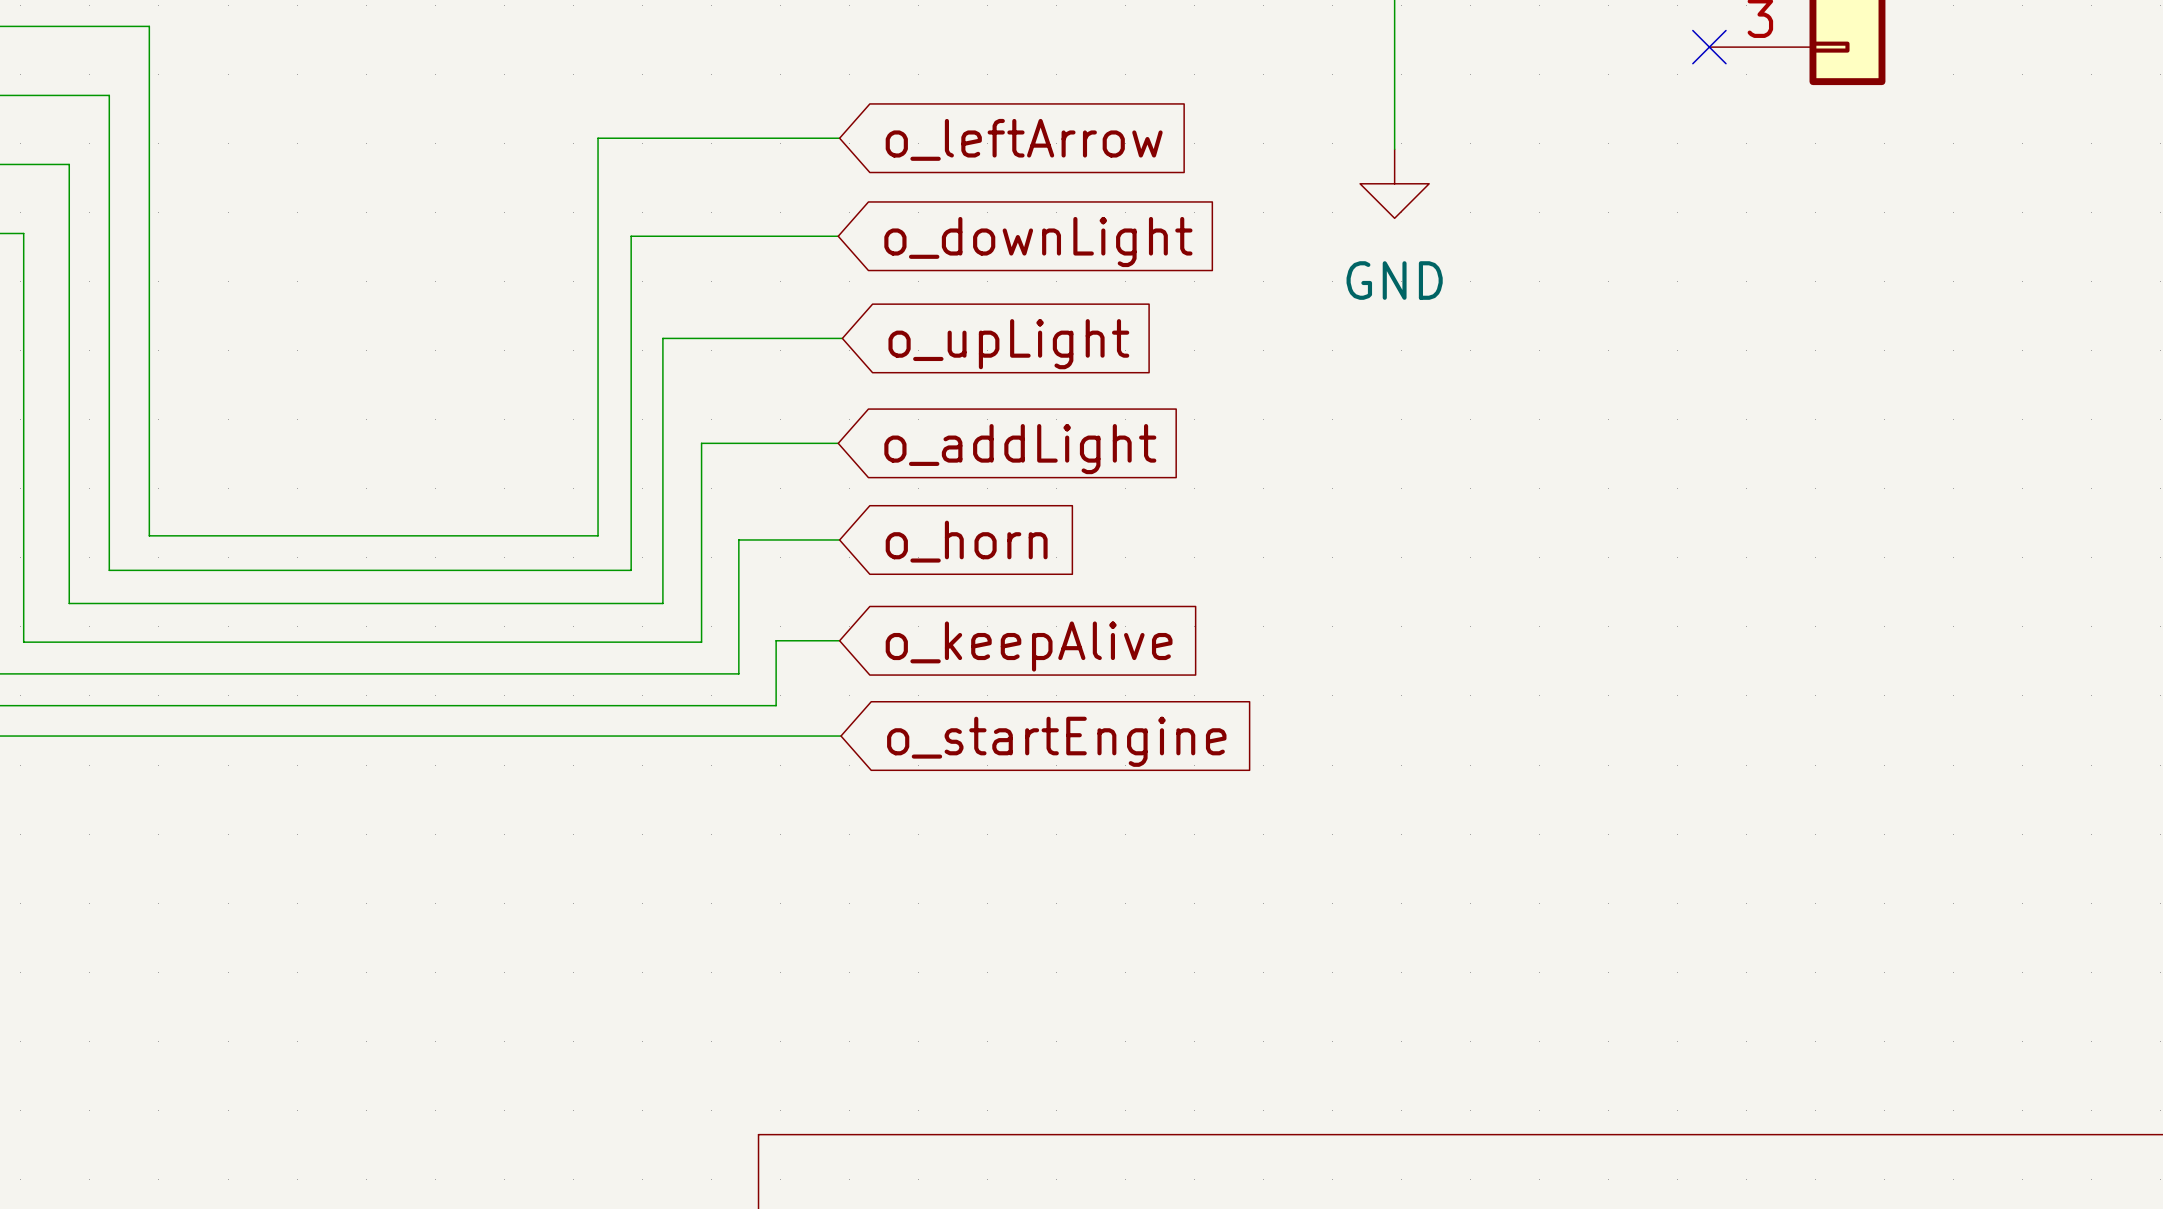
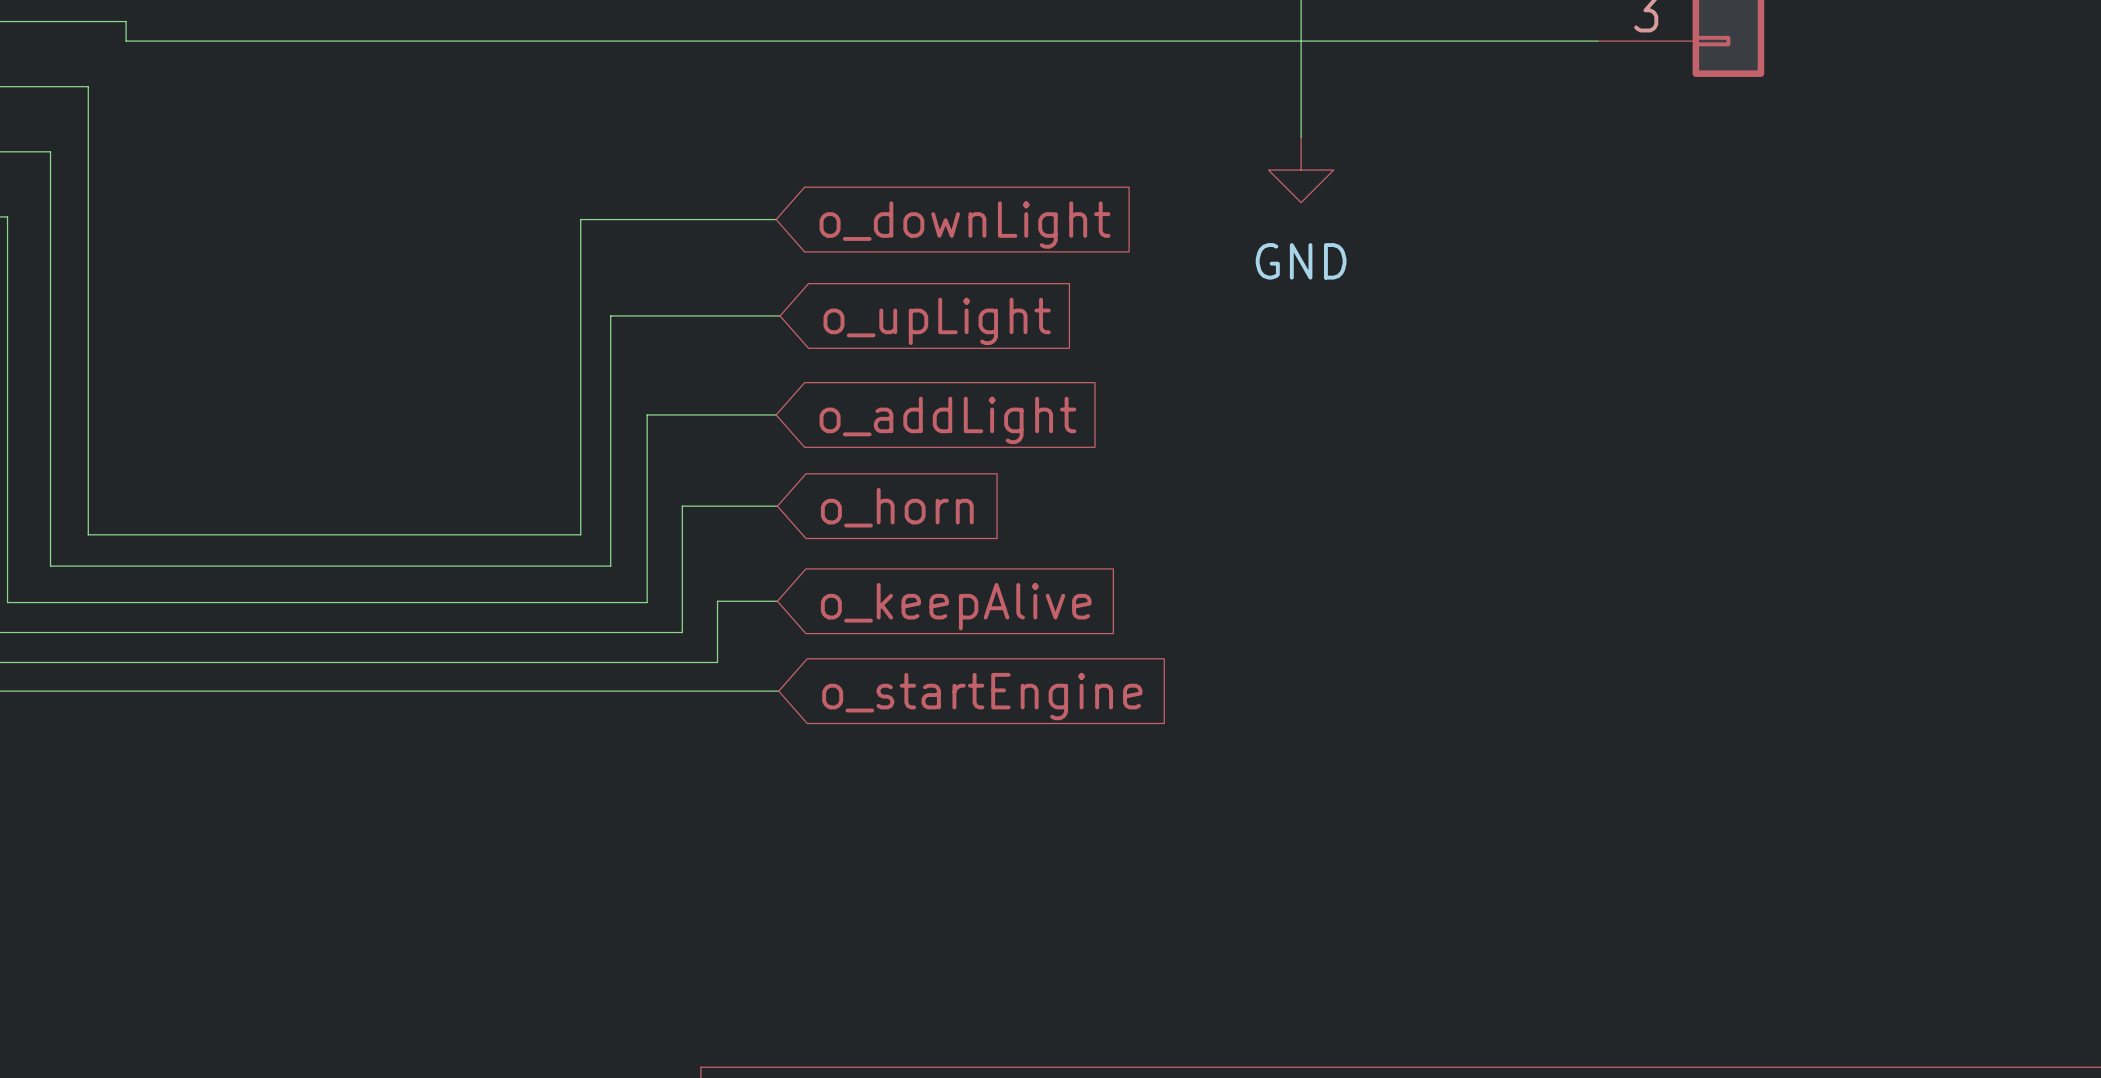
wire: (149, 47) (149, 535) (598, 535) (598, 138) (839, 138) -> (126, 41) (1598, 41)
no-connect mark: (1709, 47) -> none
global label: o_leftArrow (1024, 139) -> none

